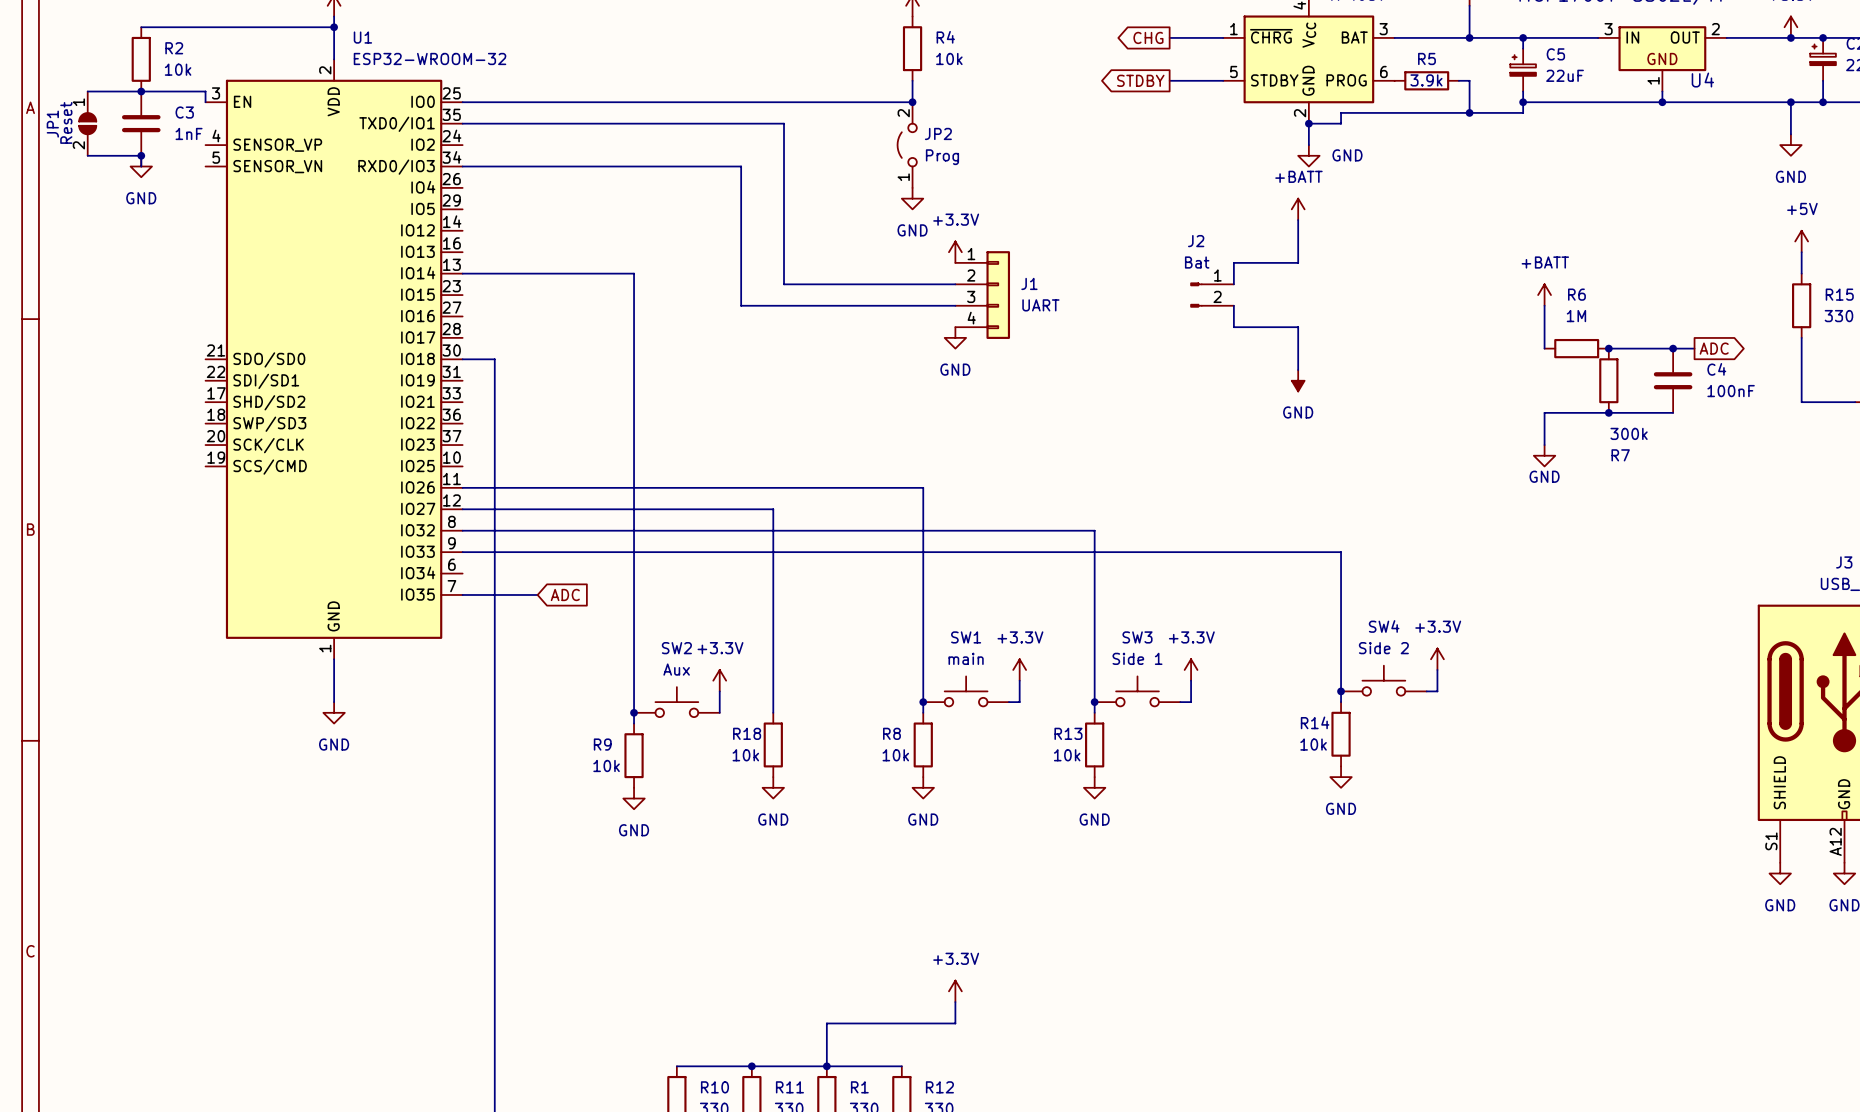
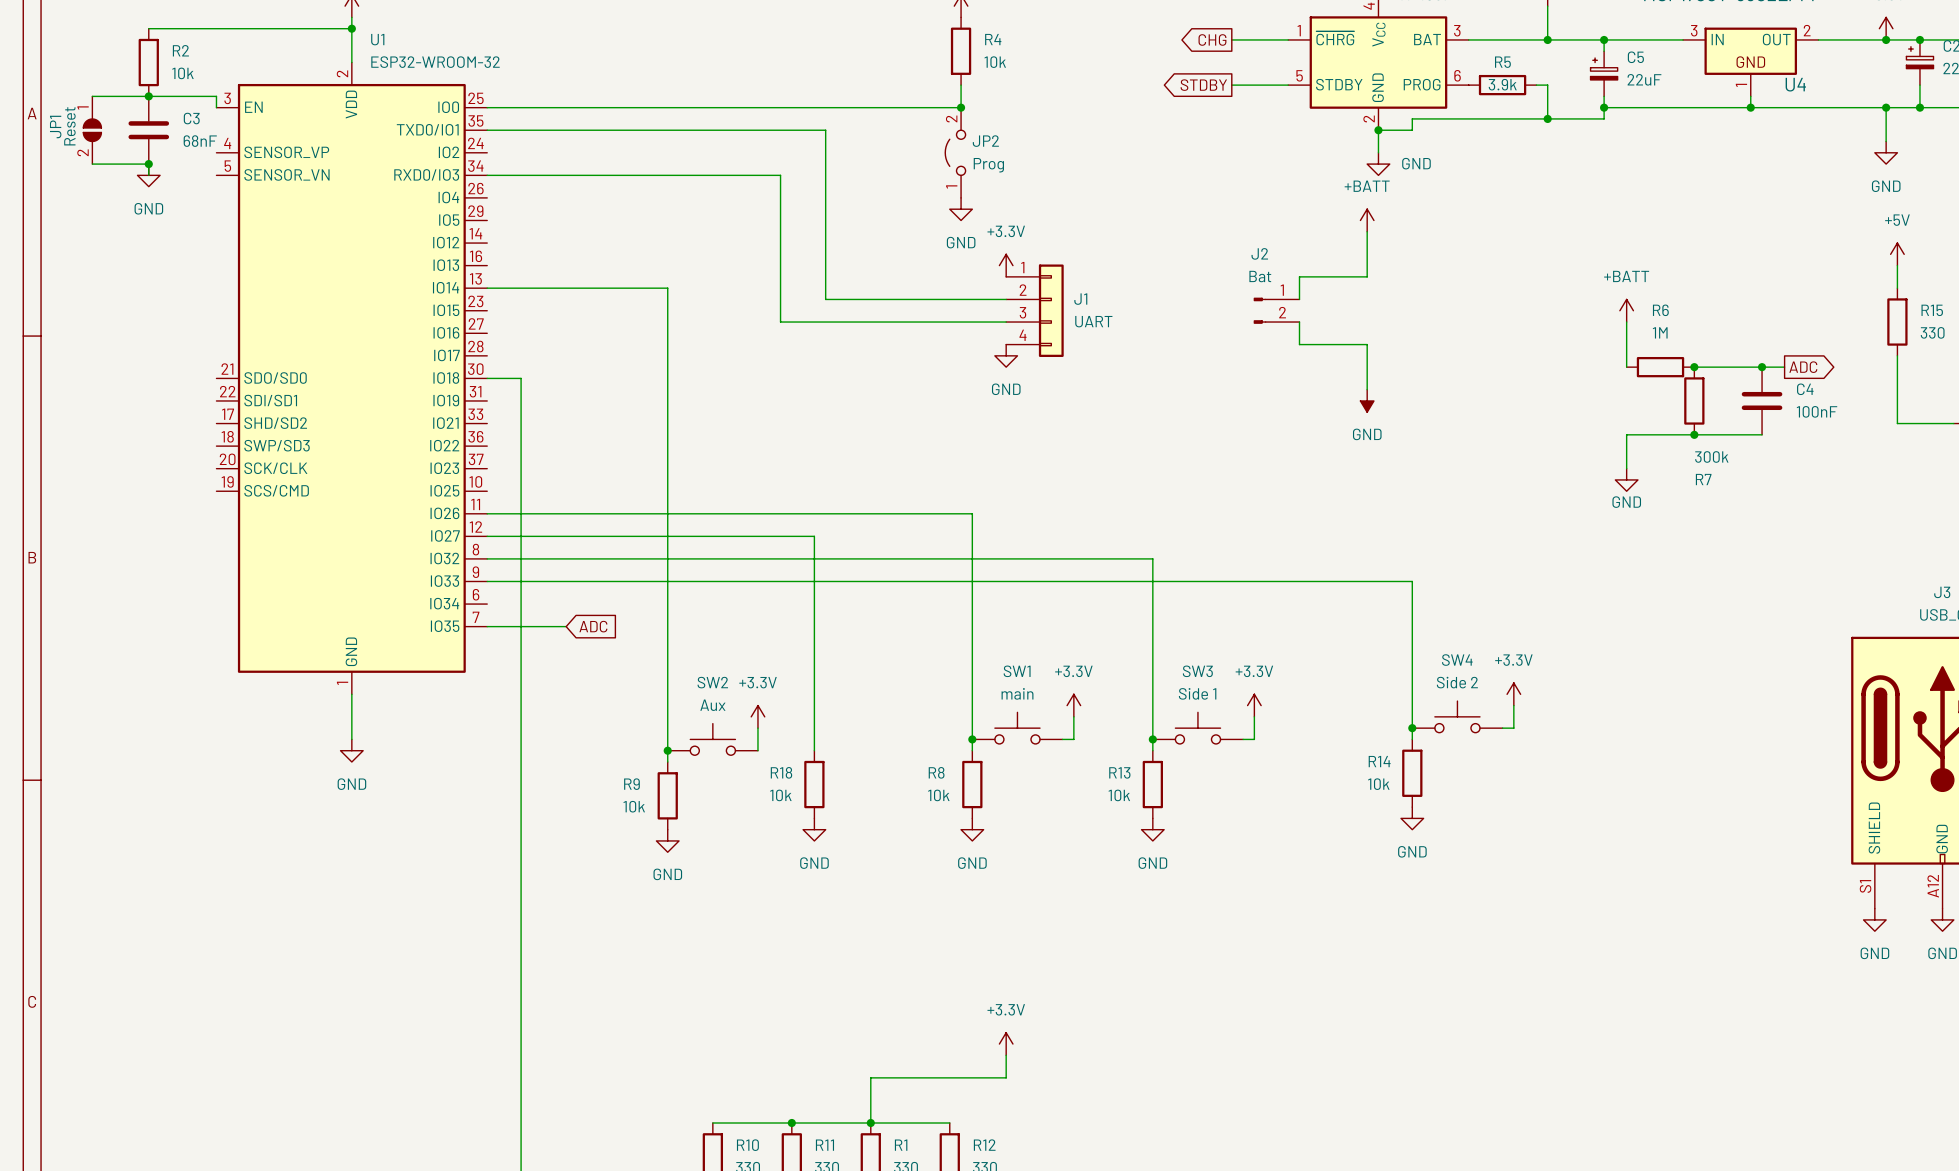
C3 value: 1nF (189, 133) -> 68nF (200, 141)

